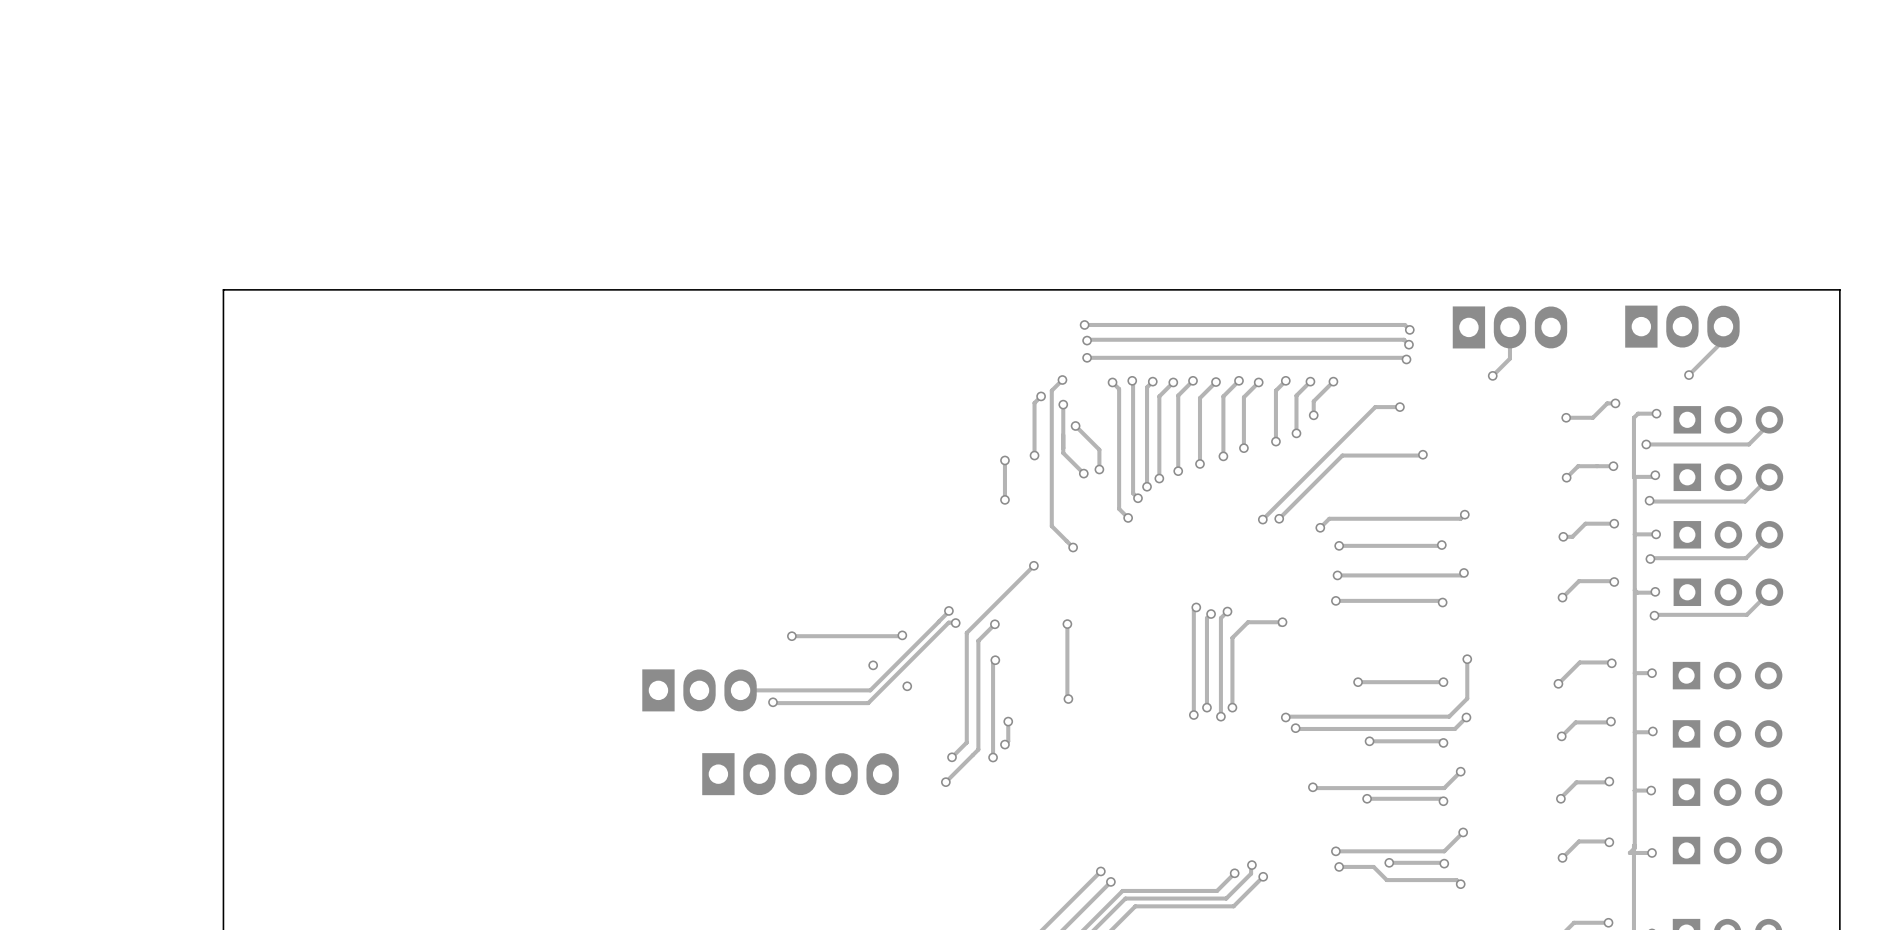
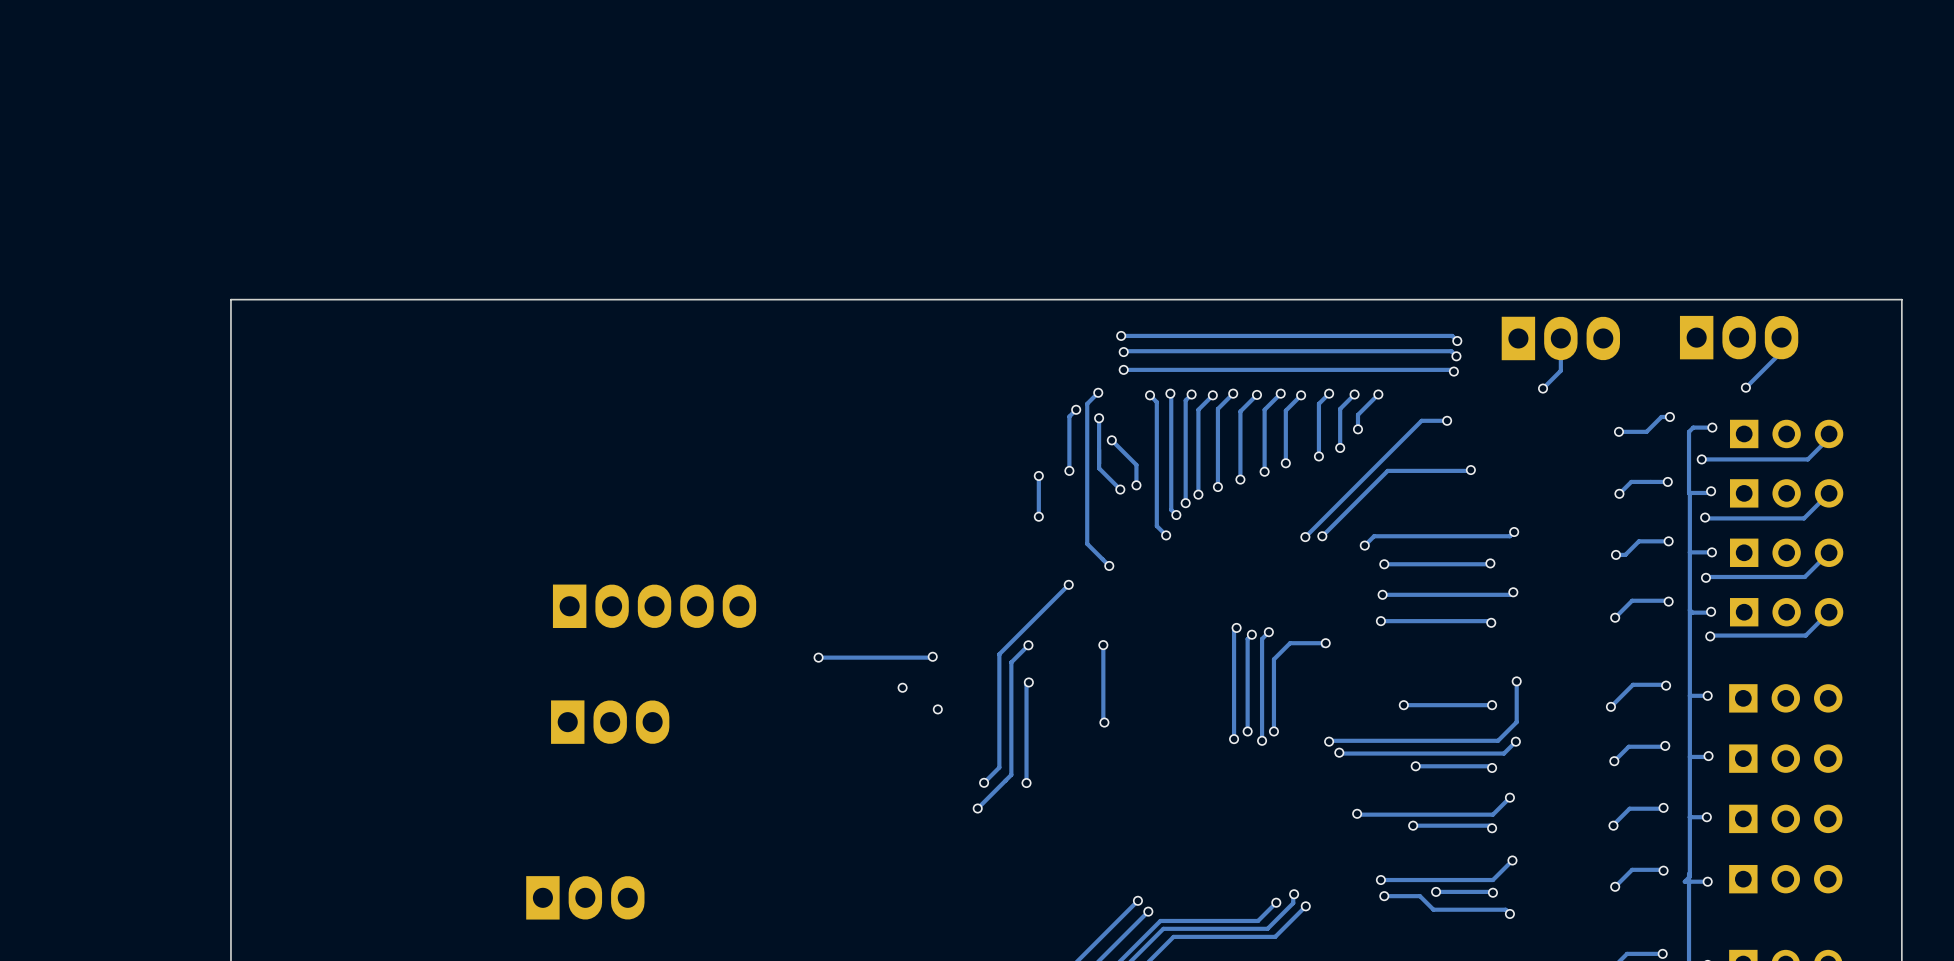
track: (948, 610) (938, 621) -> none
via: (948, 610) -> none
track: (938, 621) (870, 690) (740, 690) -> none
track: (955, 623) (948, 622) (868, 703) (773, 702) -> none
via: (955, 623) -> none
part position: (699, 690) -> (610, 722)
via: (773, 702) -> none
track: (1008, 721) (1008, 741) (1004, 744) -> none
via: (1008, 721) -> none
via: (1004, 744) -> none
part position: (800, 774) -> (654, 606)
part: none -> (585, 897)

